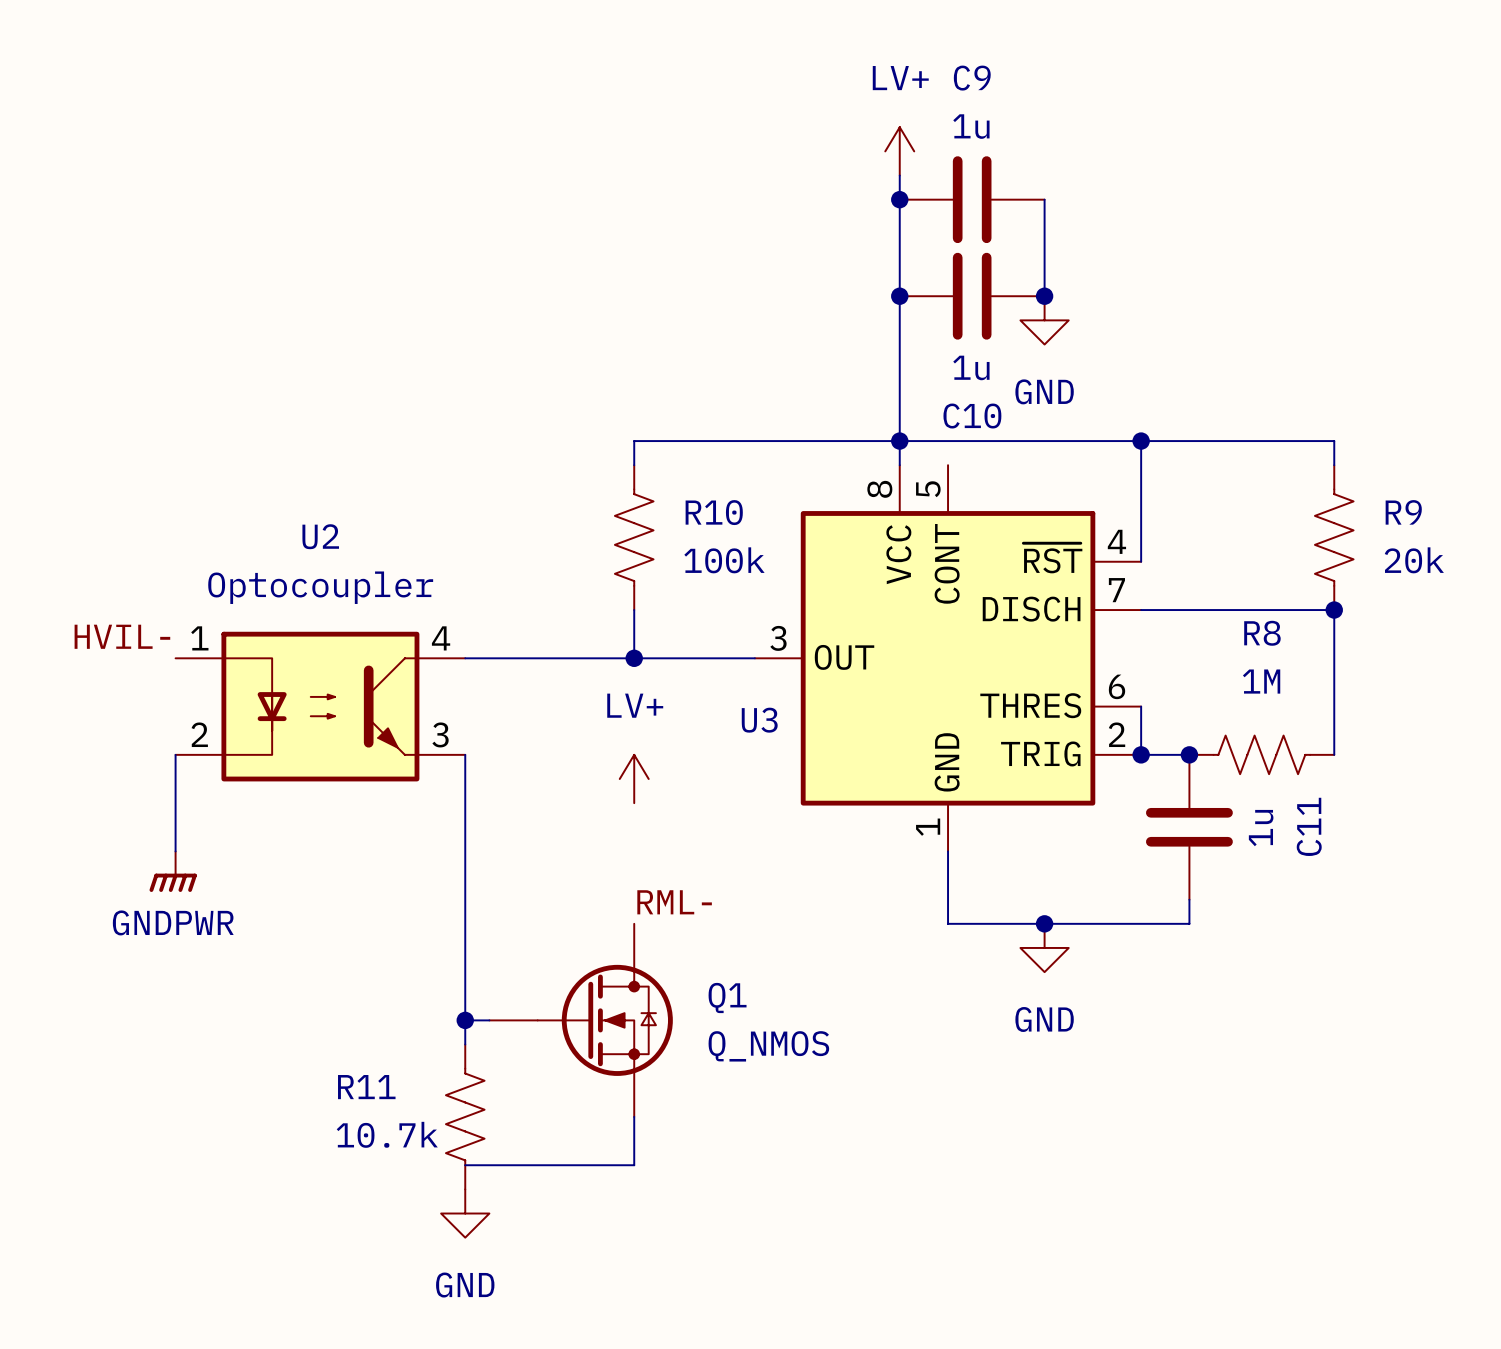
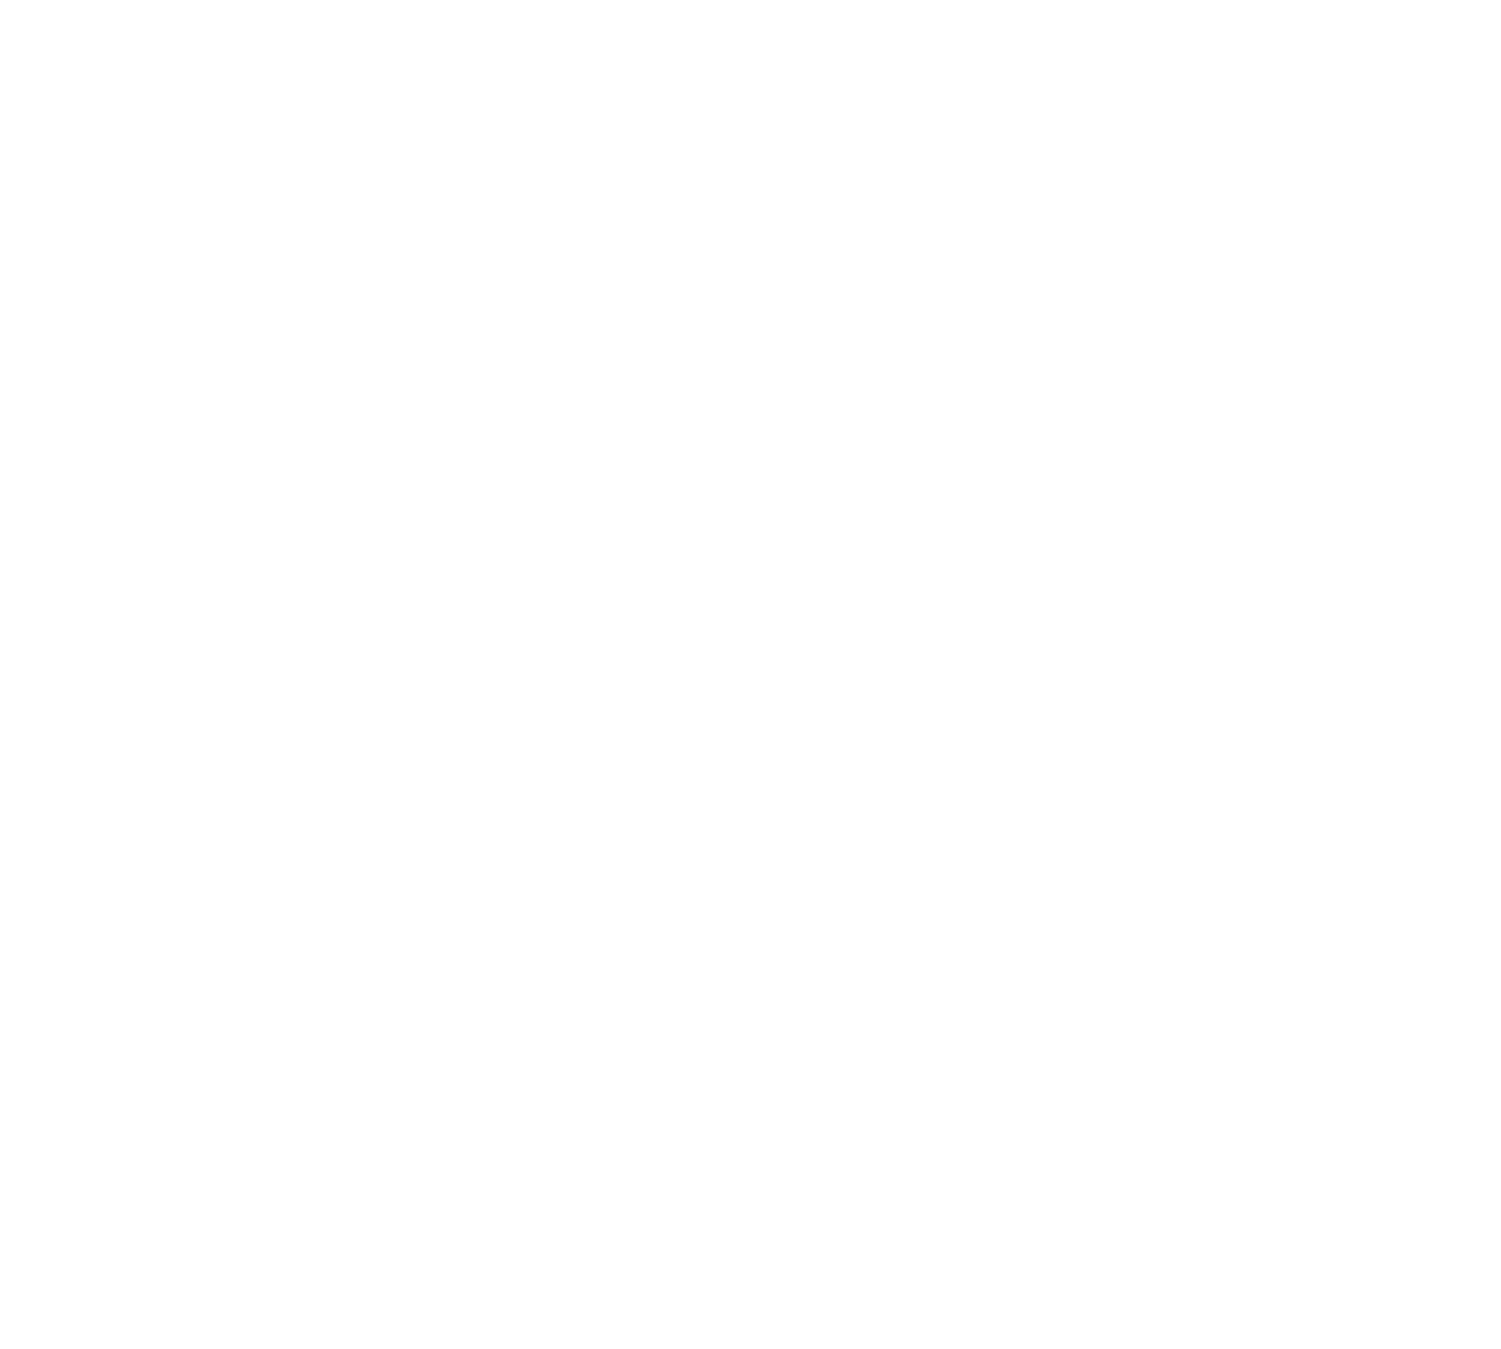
power symbol: LV+ (899, 151) -> none
wire: (899, 175) (899, 465) -> none
junction: (899, 199) -> none
C9: 1u (972, 199) -> none
wire: (1044, 199) (1044, 296) -> none
junction: (899, 296) -> none
C10: 1u (972, 296) -> none
junction: (1044, 296) -> none
power symbol: GND (1044, 320) -> none
junction: (899, 441) -> none
wire: (1141, 441) (1141, 561) -> none
junction: (1141, 441) -> none
wire: (634, 465) (634, 441) (1334, 441) (1334, 465) -> none
R10: 100k (634, 537) -> none
R9: 20k (1334, 537) -> none
wire: (634, 610) (634, 658) -> none
wire: (1141, 610) (1334, 610) (1334, 754) -> none
junction: (1334, 610) -> none
label: HVIL- (122, 636) -> none
wire: (465, 658) (754, 658) -> none
junction: (634, 658) -> none
U3: (948, 658) -> none
U2: Optocoupler (320, 706) -> none
wire: (1141, 706) (1141, 754) (1189, 754) -> none
wire: (175, 754) (175, 851) -> none
wire: (465, 754) (465, 1044) -> none
junction: (1141, 754) -> none
junction: (1189, 754) -> none
R8: 1M (1261, 754) -> none
power symbol: LV+ (634, 779) -> none
C11: 1u (1189, 827) -> none
wire: (948, 851) (948, 923) (1189, 923) (1189, 899) -> none
power symbol: GNDPWR (173, 871) -> none
label: RML- (674, 902) -> none
junction: (1044, 923) -> none
power symbol: GND (1044, 947) -> none
wire: (465, 1020) (489, 1020) -> none
junction: (465, 1020) -> none
Q1: Q_NMOS (581, 1020) -> none
R11: 10.7k (465, 1116) -> none
wire: (634, 1116) (634, 1165) (465, 1165) -> none
power symbol: GND (465, 1213) -> none

